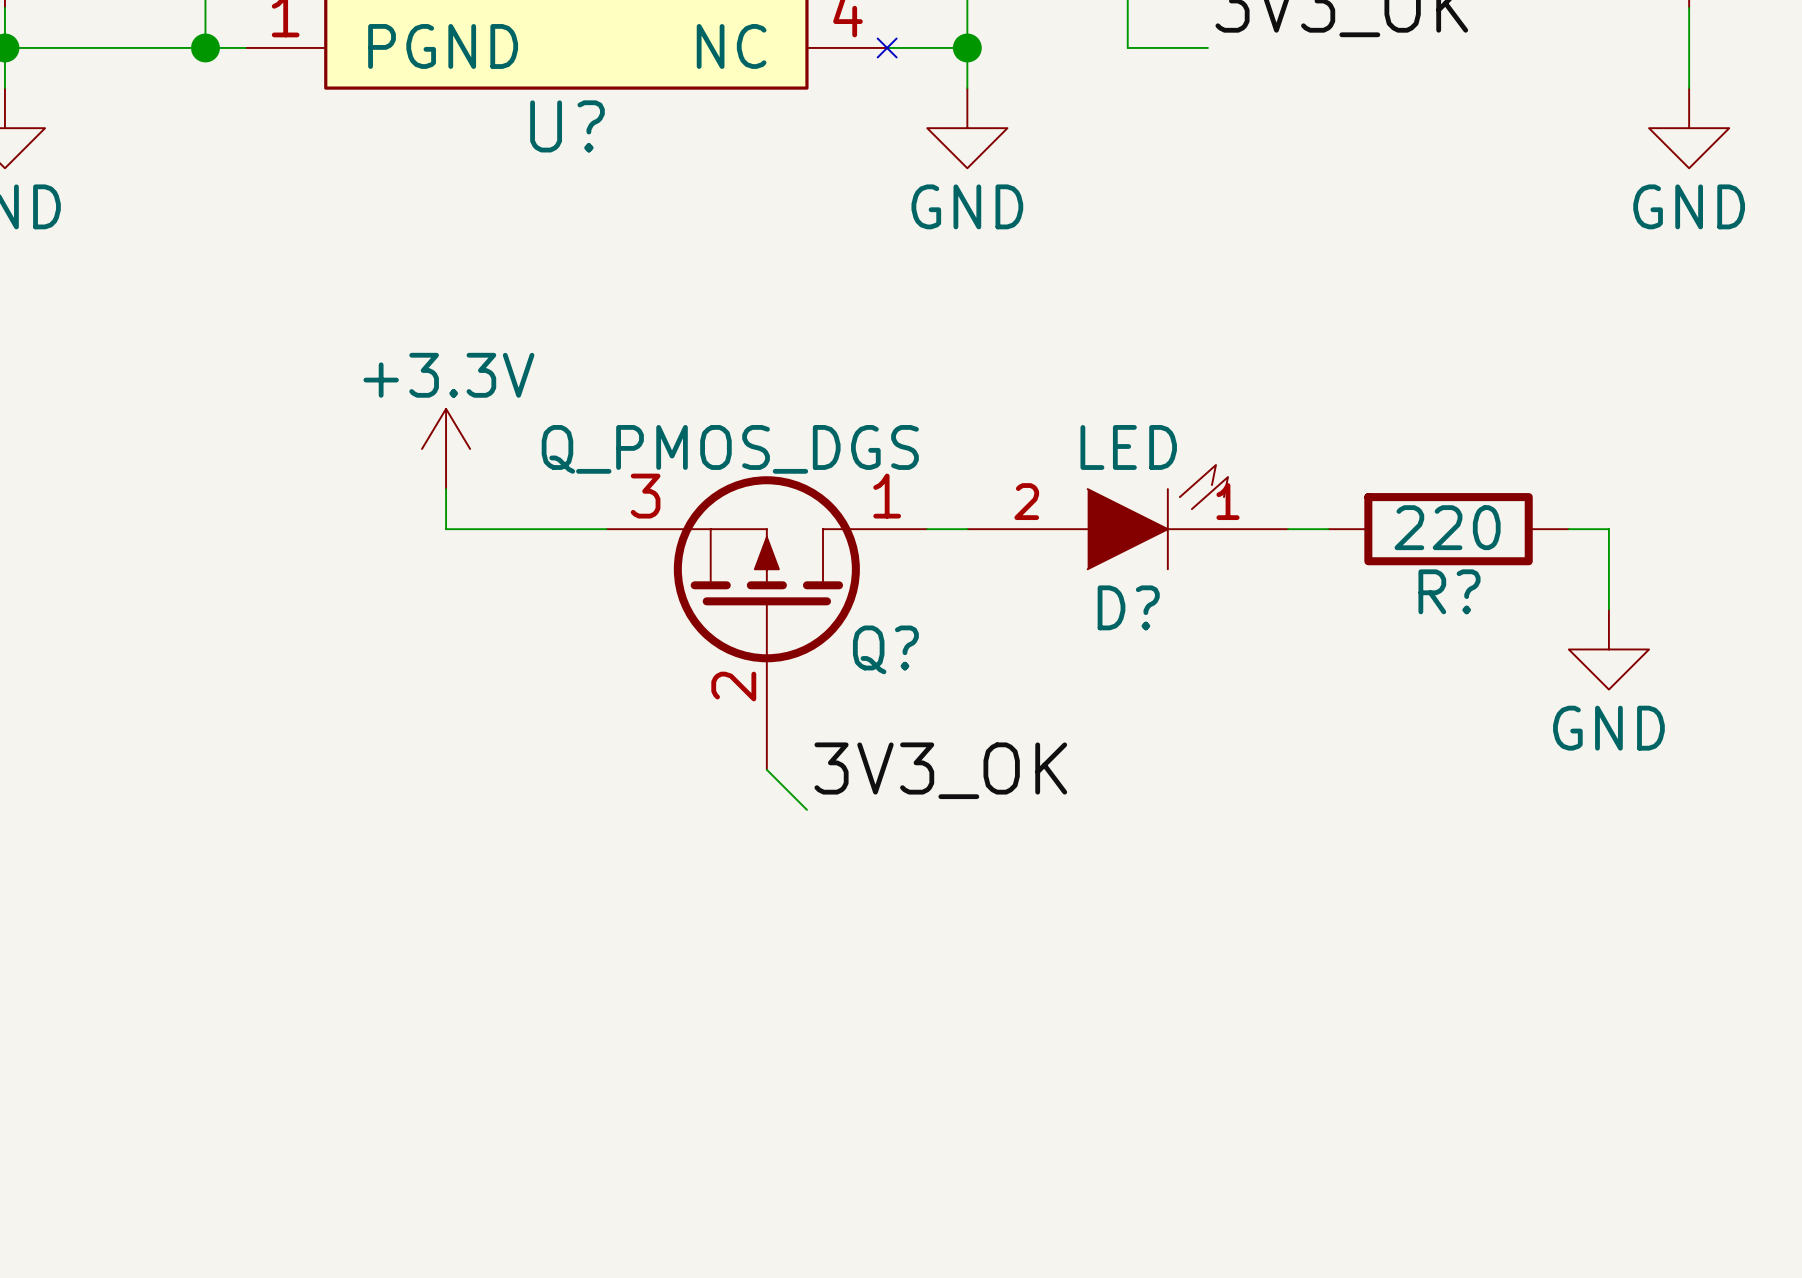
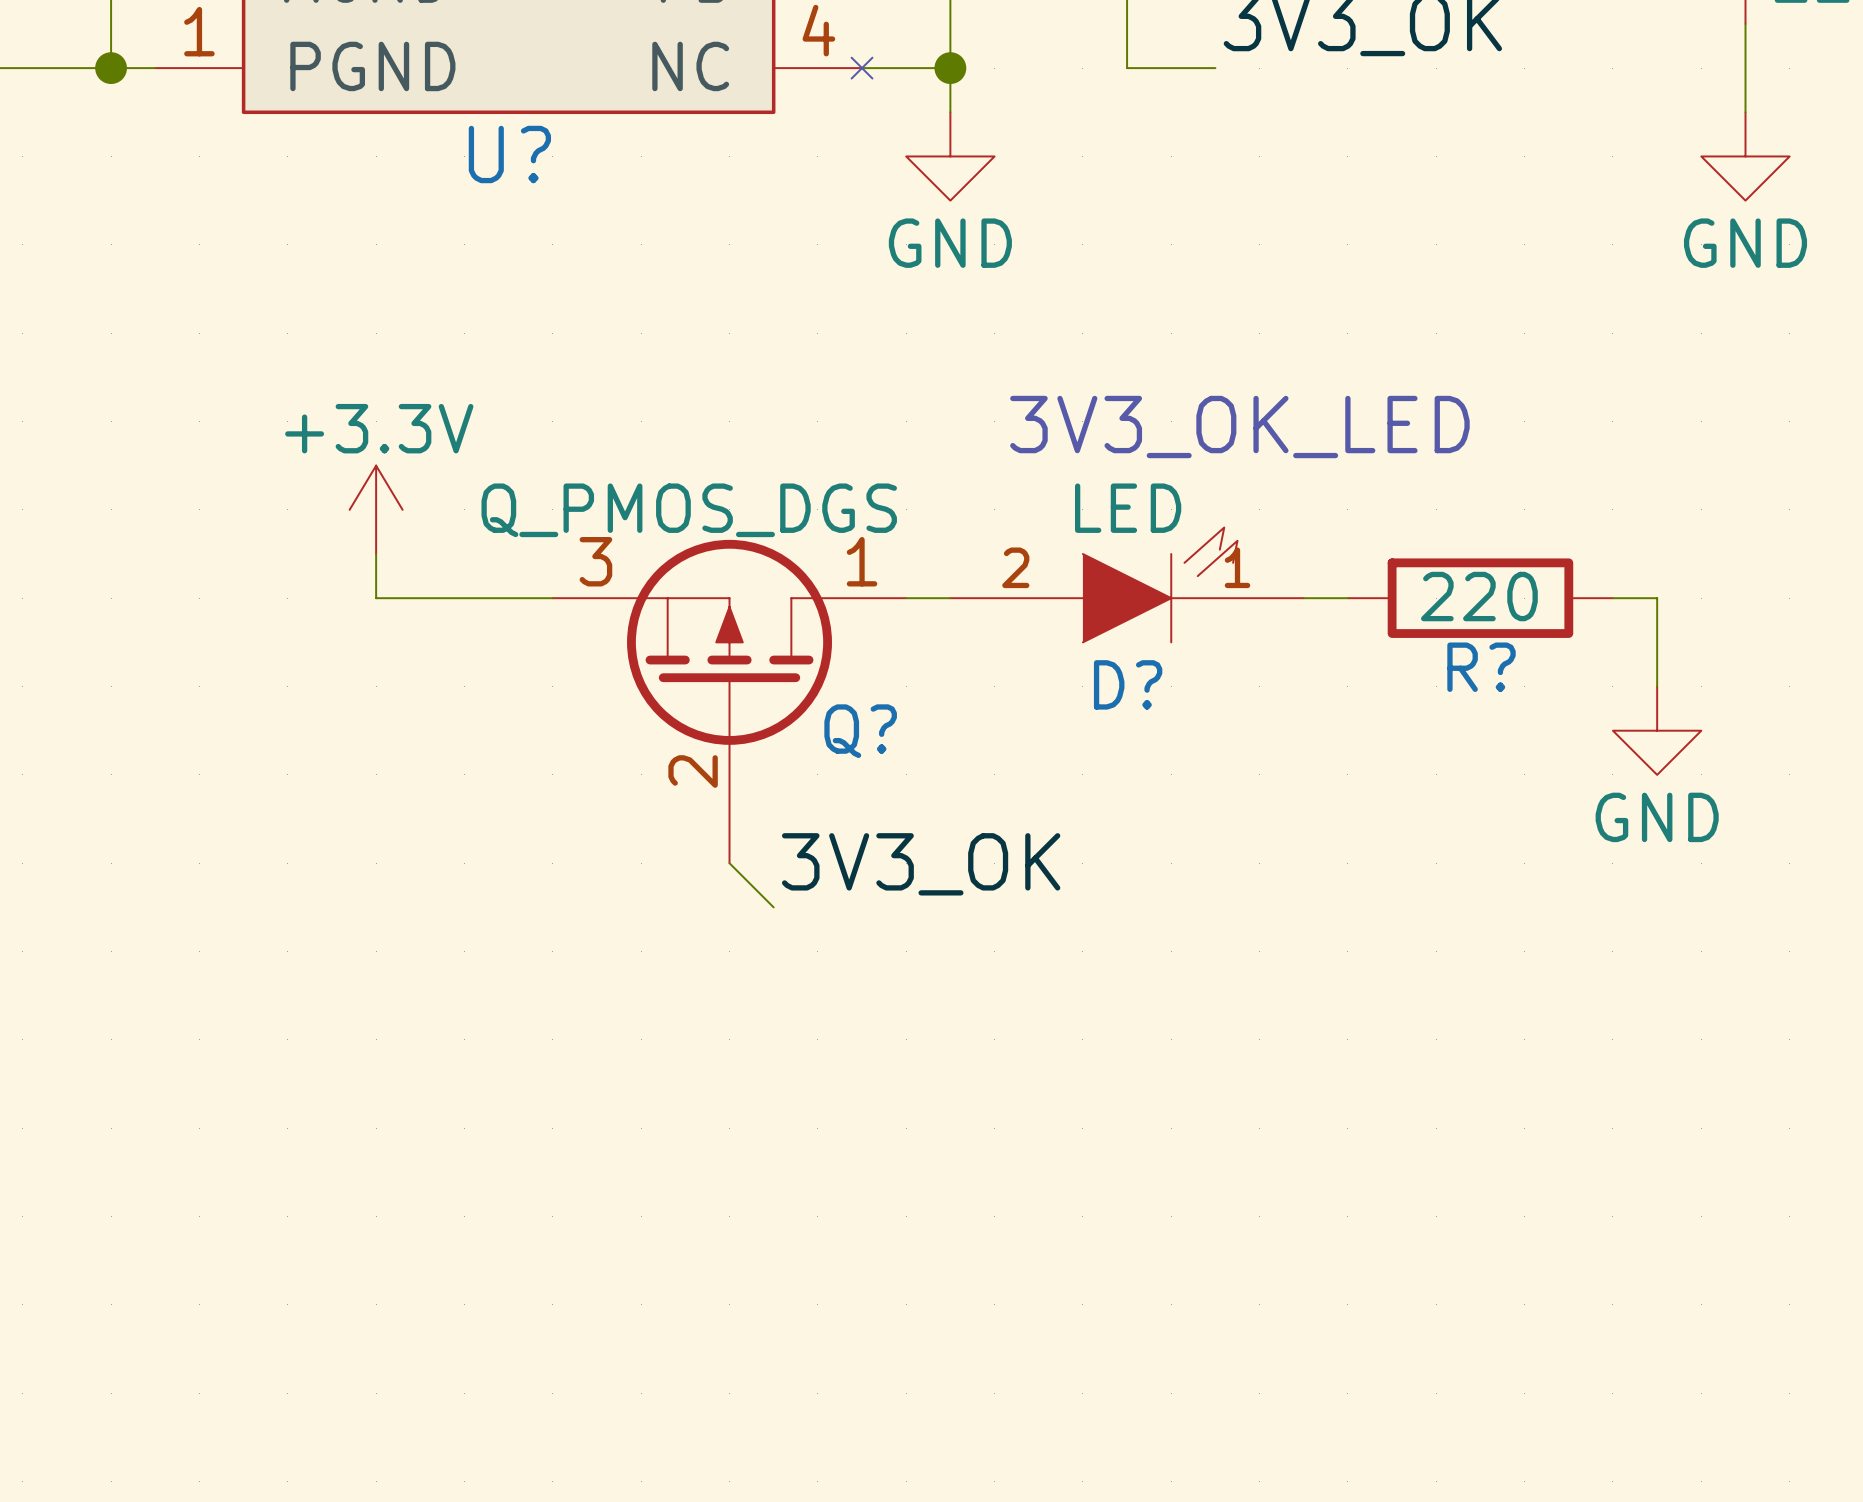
text: none -> 3V3_OK_LED (1239, 427)

